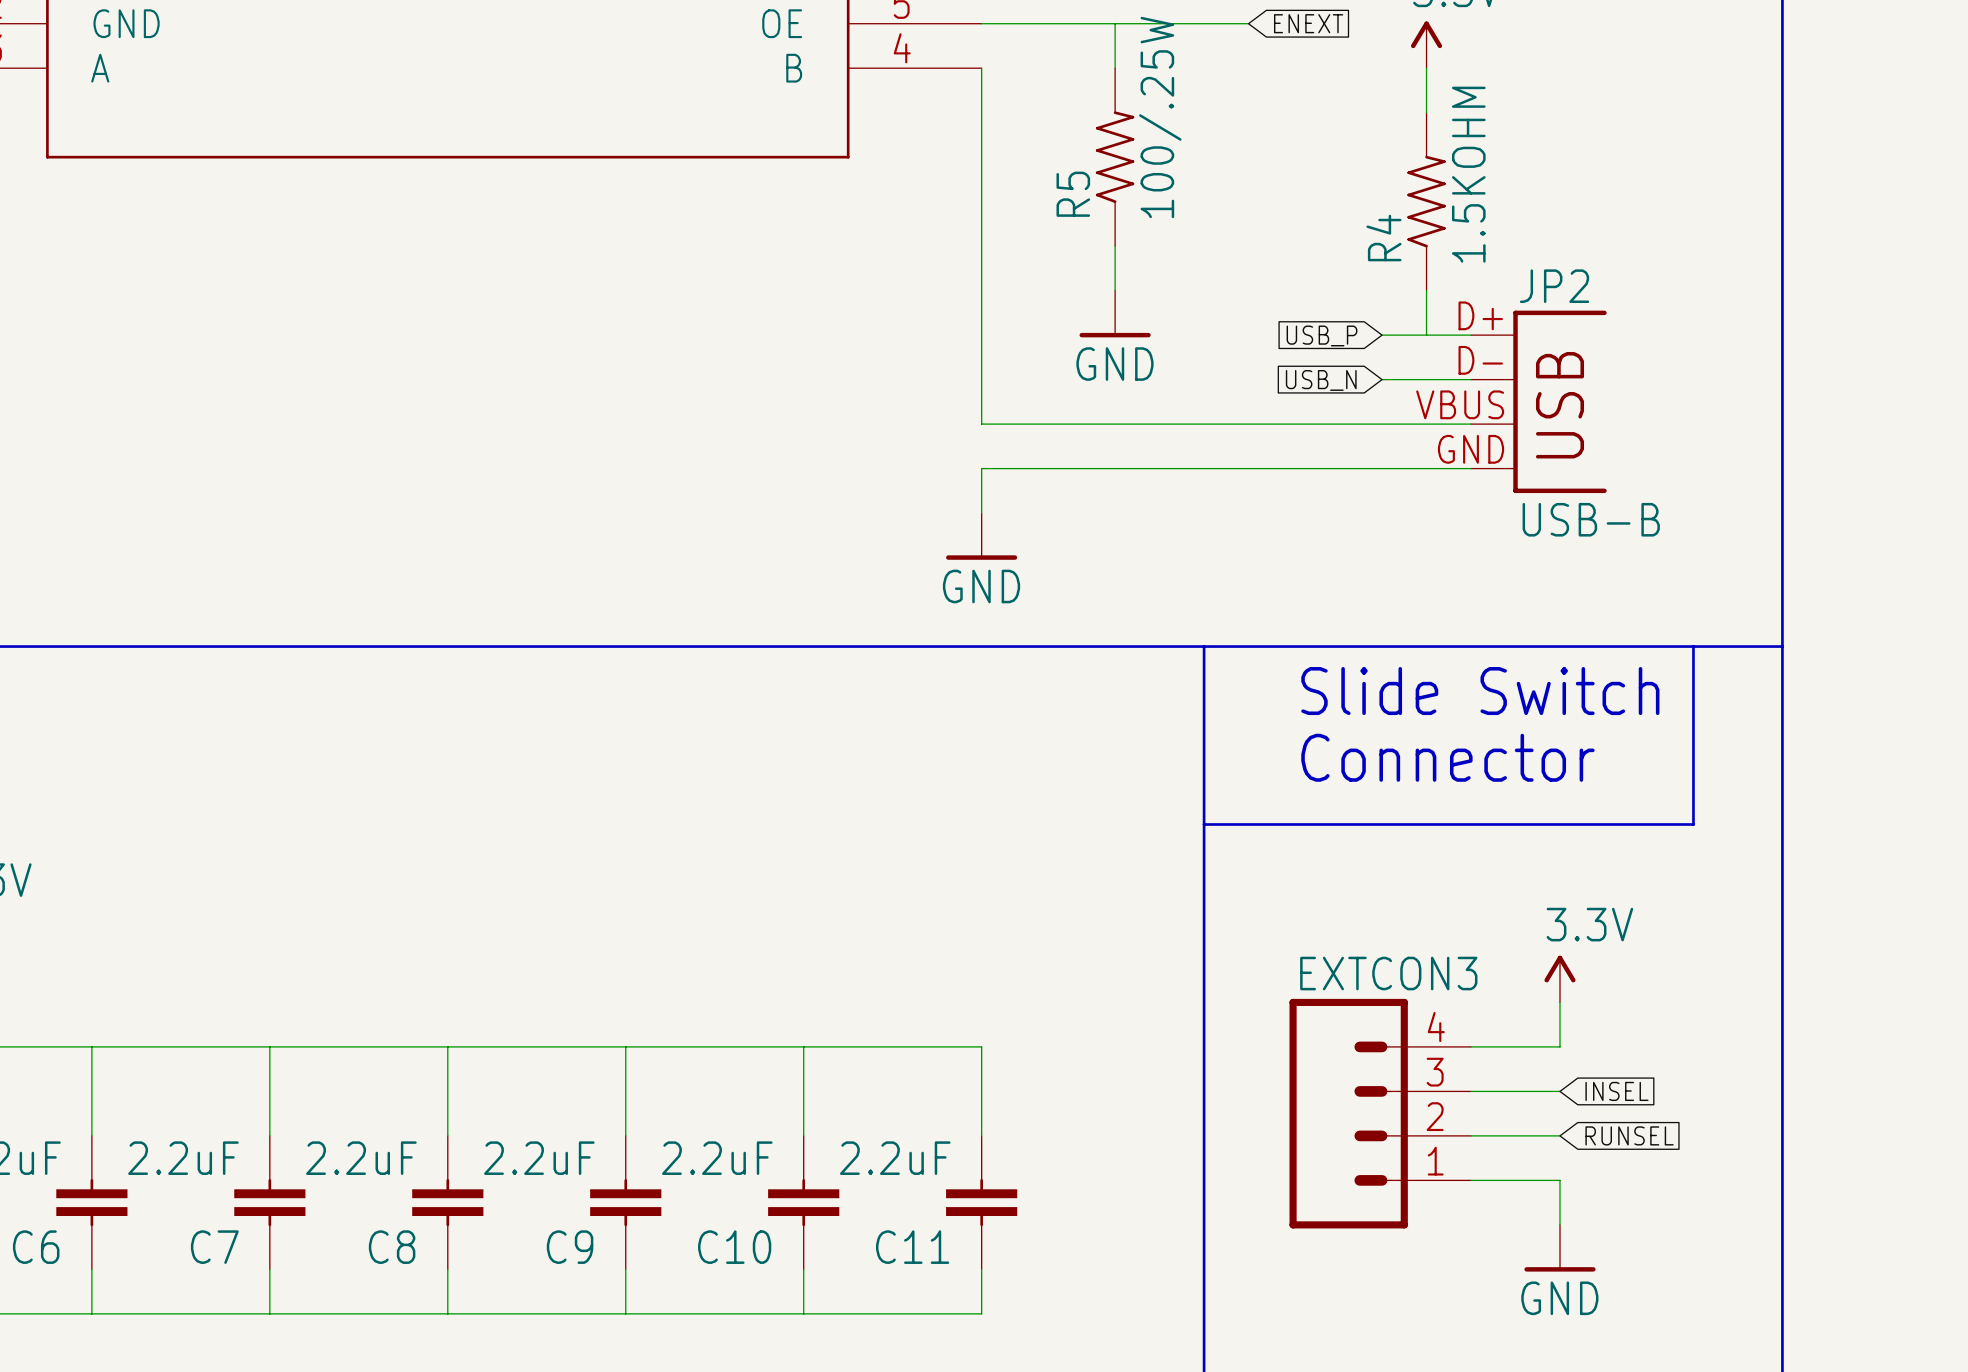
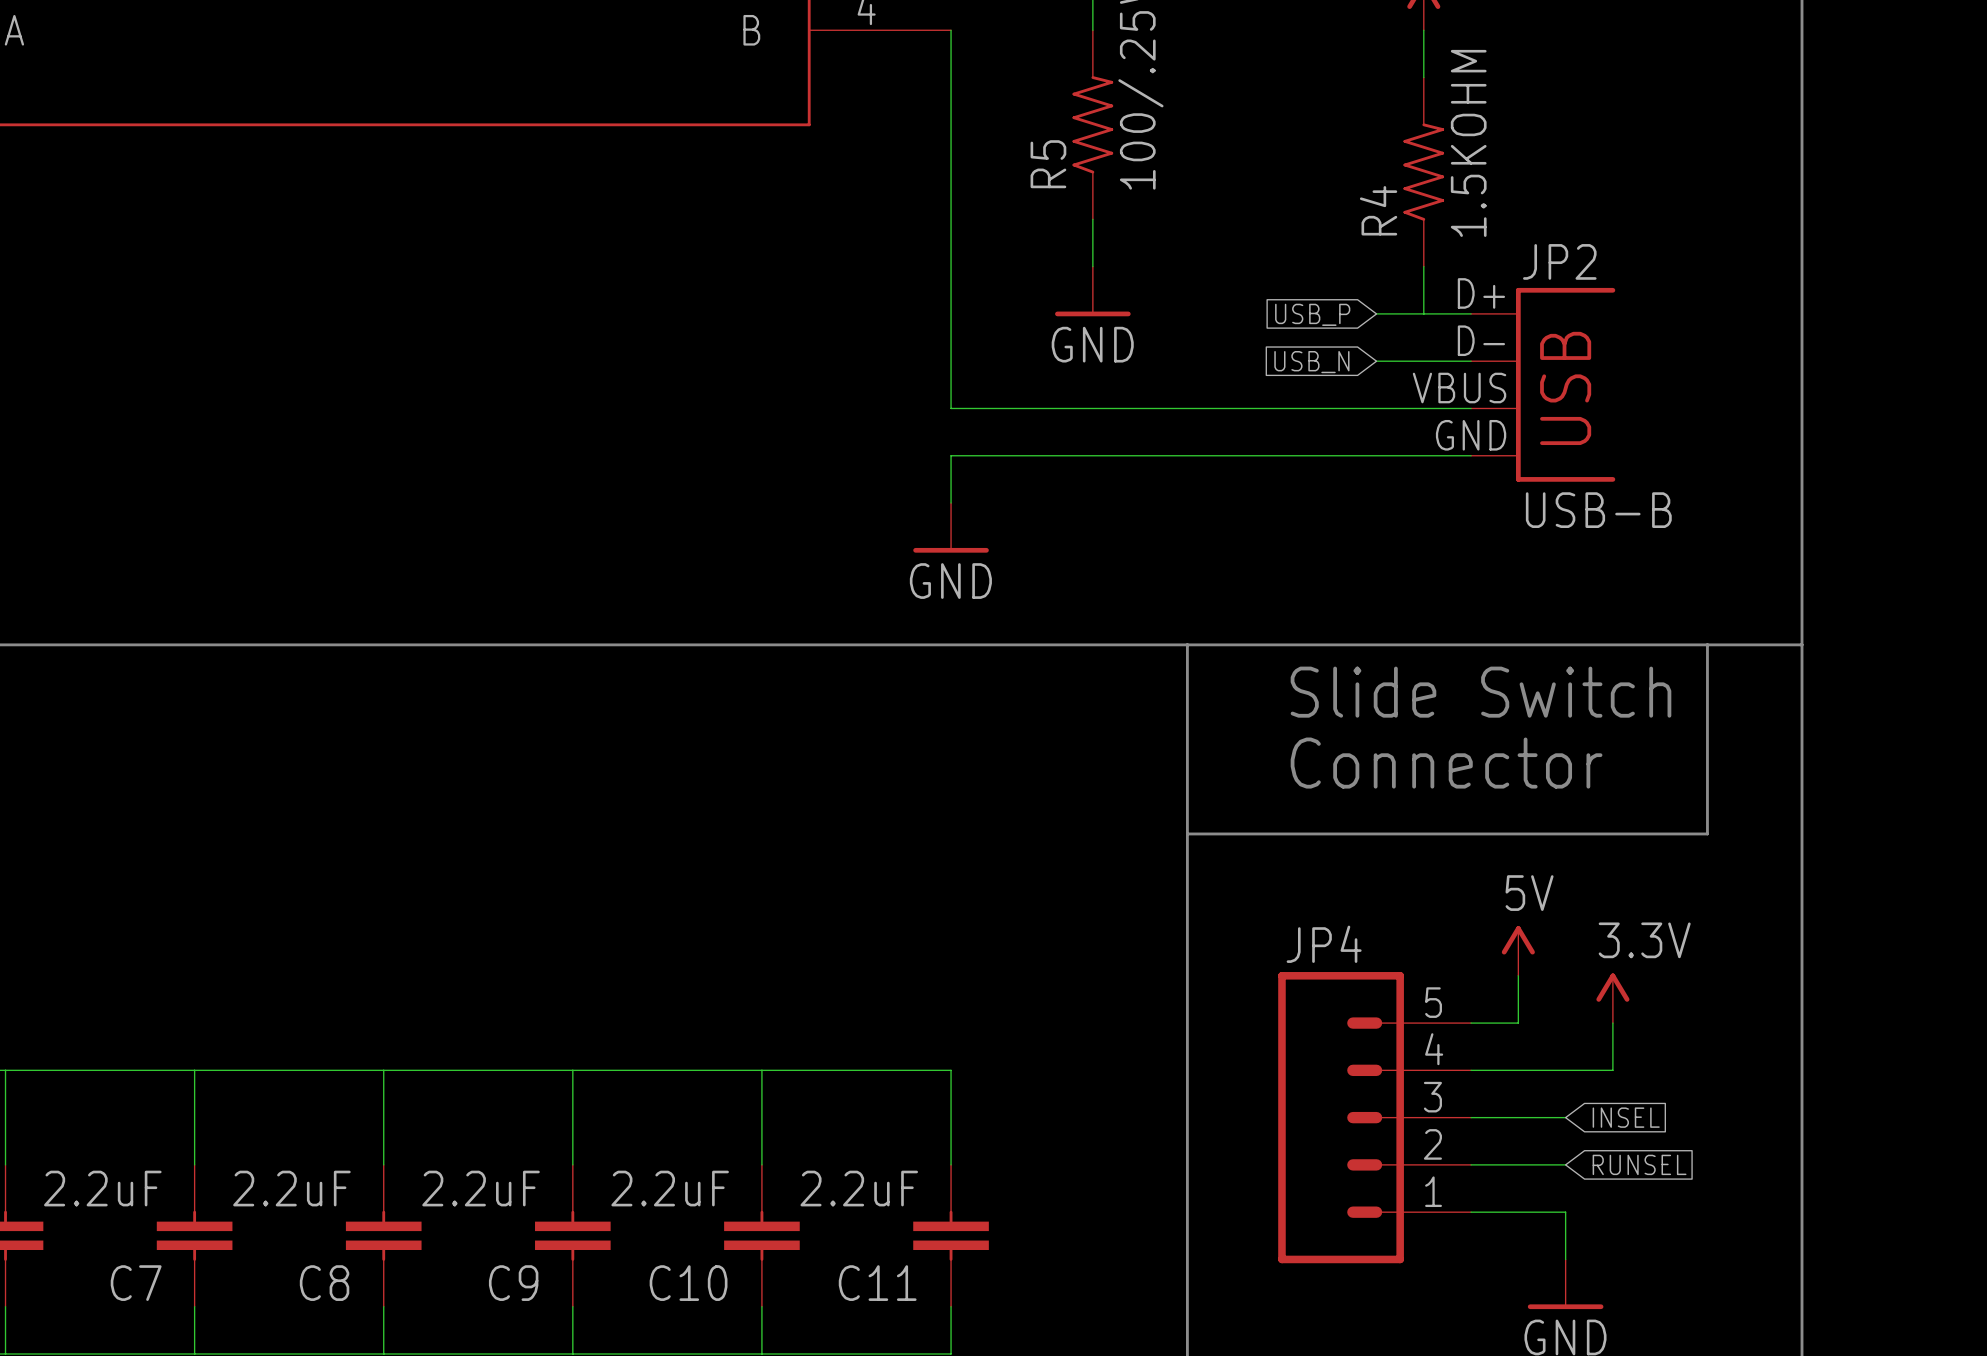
power symbol: none -> 5V (1518, 950)
wire: none -> (1518, 975) (1518, 1023) (1471, 1023)
power symbol position: 3.3V (1560, 979) -> 3.3V (1612, 998)
wire: (1560, 1002) (1560, 1046) -> (1612, 1023) (1612, 1070) (1565, 1070)
JP4: none -> (1374, 1117)
EXTCON3: (1380, 1113) -> none

